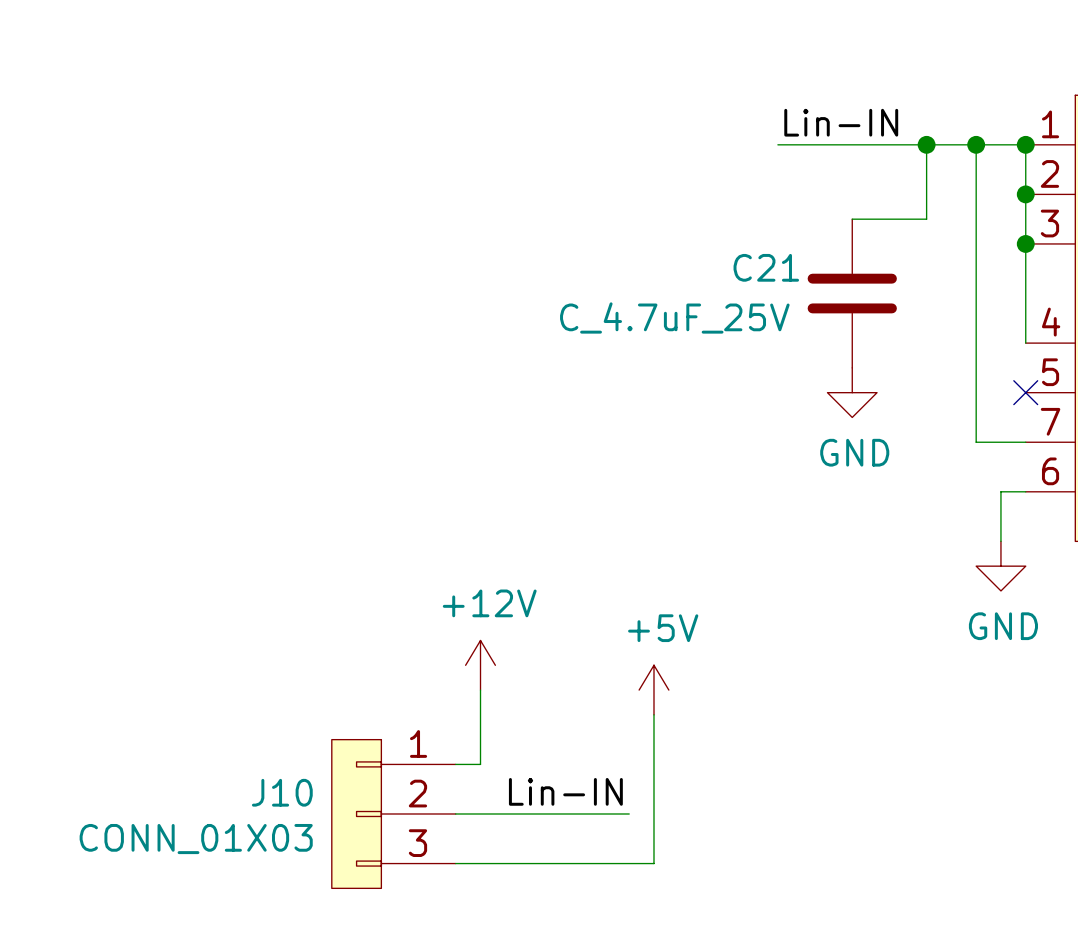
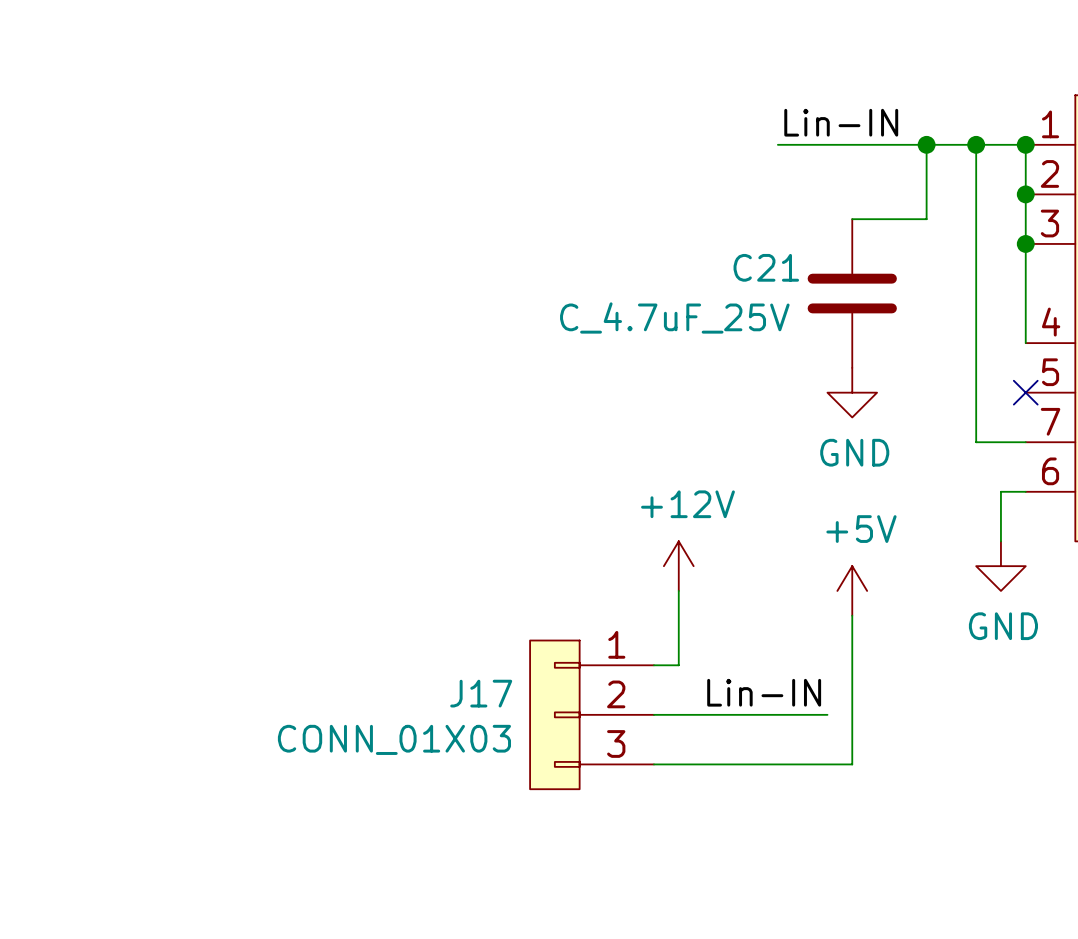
wire: none -> (852, 615) (852, 764) (653, 764)
power symbol position: +12V (480, 665) -> +12V (678, 566)
wire: (480, 690) (480, 764) (455, 764) -> (678, 590) (678, 665) (653, 665)
power symbol position: +5V (653, 690) -> +5V (852, 590)
J17: none -> CONN_01X03 (592, 714)
wire: (653, 714) (653, 863) (455, 863) -> (653, 714) (827, 714)
label position: Lin-IN (565, 791) -> Lin-IN (764, 692)
J10: CONN_01X03 (393, 813) -> none
wire: (455, 813) (629, 813) -> none

